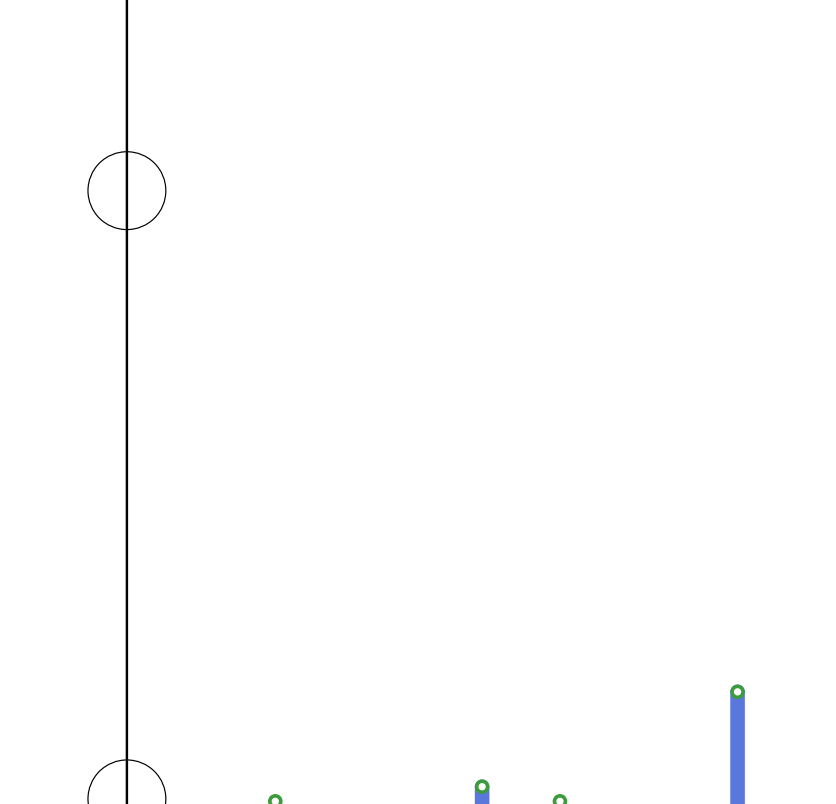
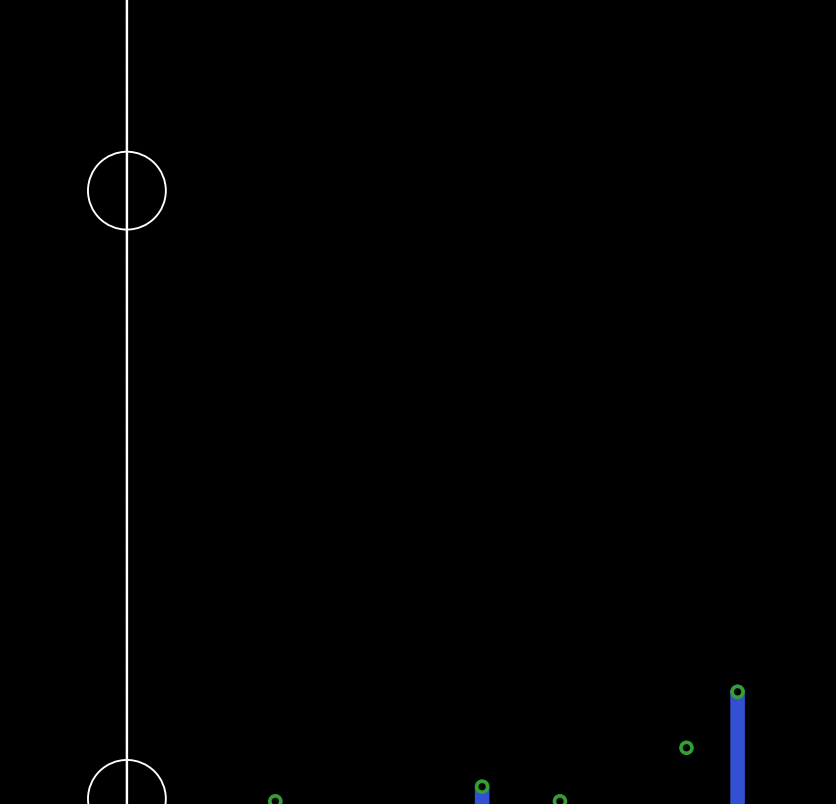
via: none -> (686, 747)

